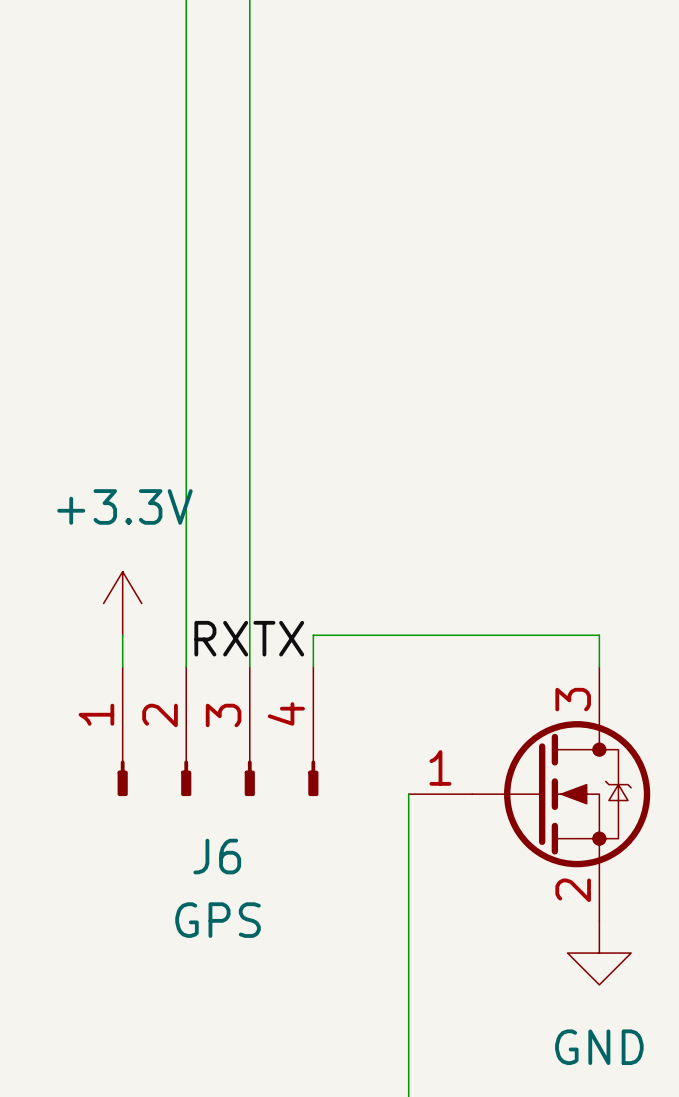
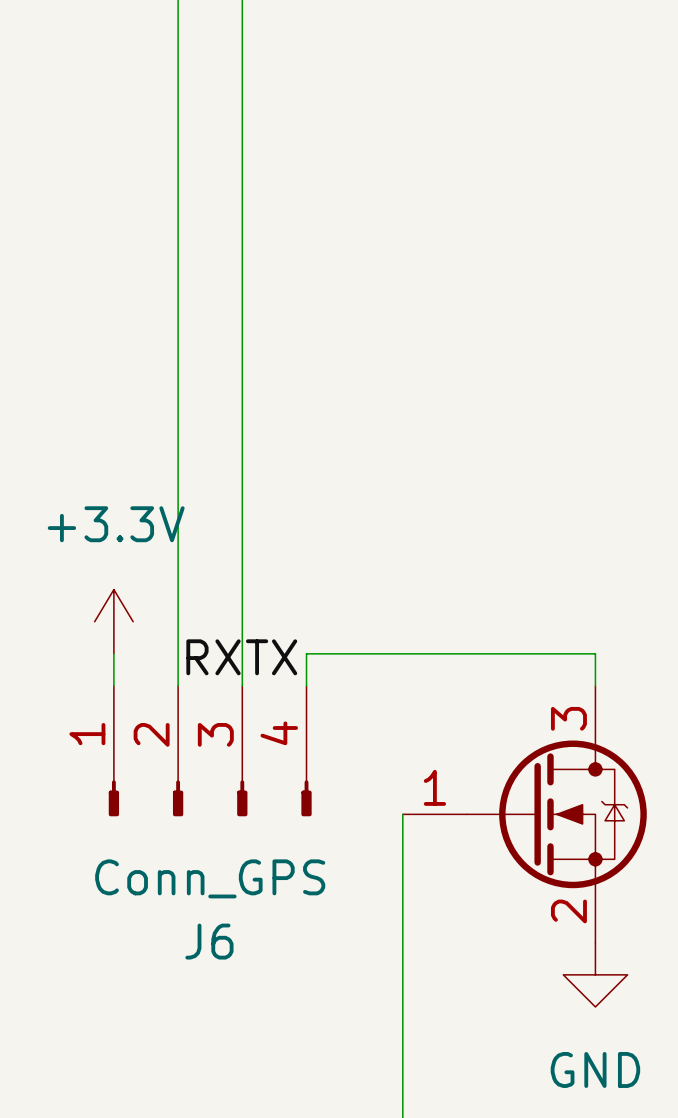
J6 name position: J6 (217, 856) -> J6 (209, 941)
J6 value: GPS (218, 920) -> Conn_GPS (210, 878)

